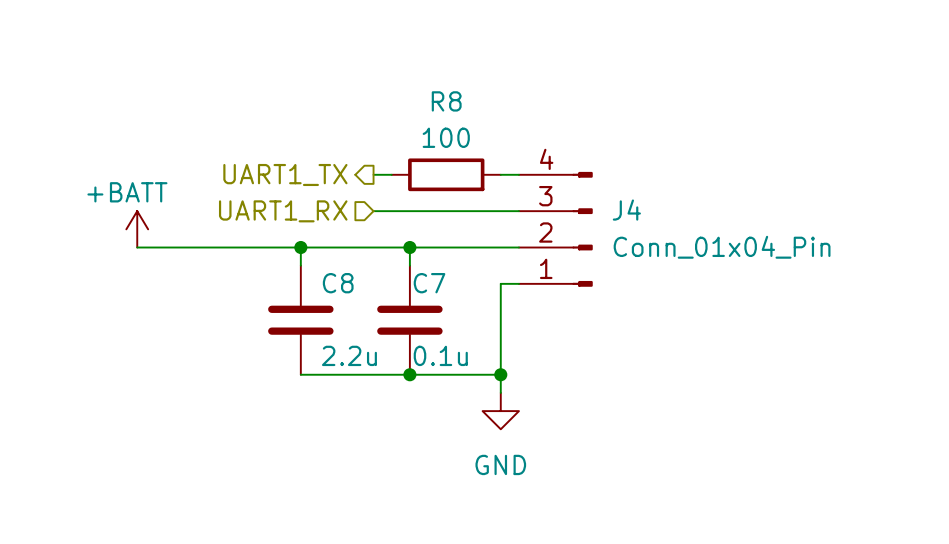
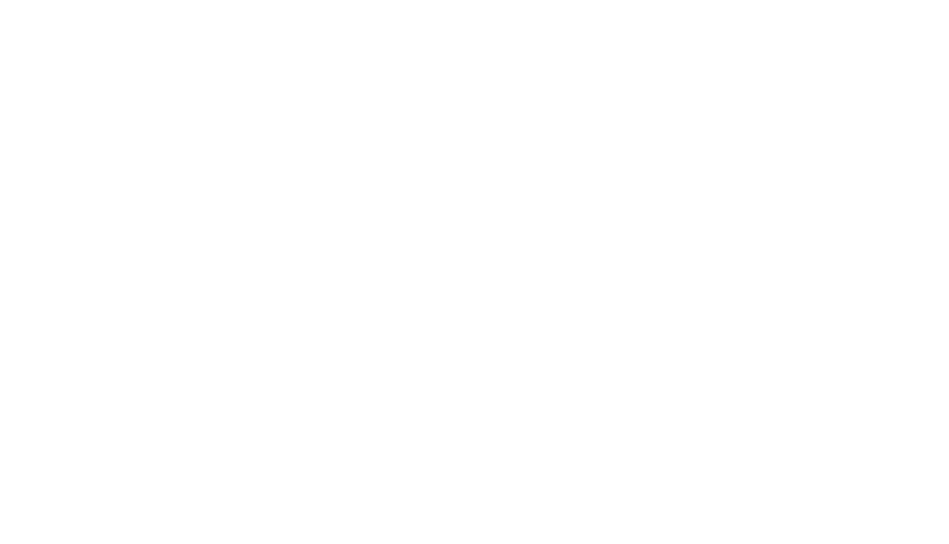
hierarchical label: UART1_TX (285, 174) -> none
wire: (373, 174) (391, 174) -> none
R8: 100 (446, 174) -> none
wire: (500, 174) (518, 174) -> none
hierarchical label: UART1_RX (283, 211) -> none
wire: (373, 211) (518, 211) -> none
power symbol: +BATT (137, 229) -> none
J4: Conn_01x04_Pin (555, 229) -> none
wire: (137, 247) (518, 247) -> none
wire: (300, 247) (300, 265) -> none
junction: (300, 247) -> none
wire: (409, 247) (409, 265) -> none
junction: (409, 247) -> none
wire: (518, 283) (500, 283) (500, 392) -> none
C8: 2.2u (300, 320) -> none
C7: 0.1u (409, 320) -> none
wire: (300, 374) (500, 374) -> none
junction: (409, 374) -> none
junction: (500, 374) -> none
power symbol: GND (500, 411) -> none

